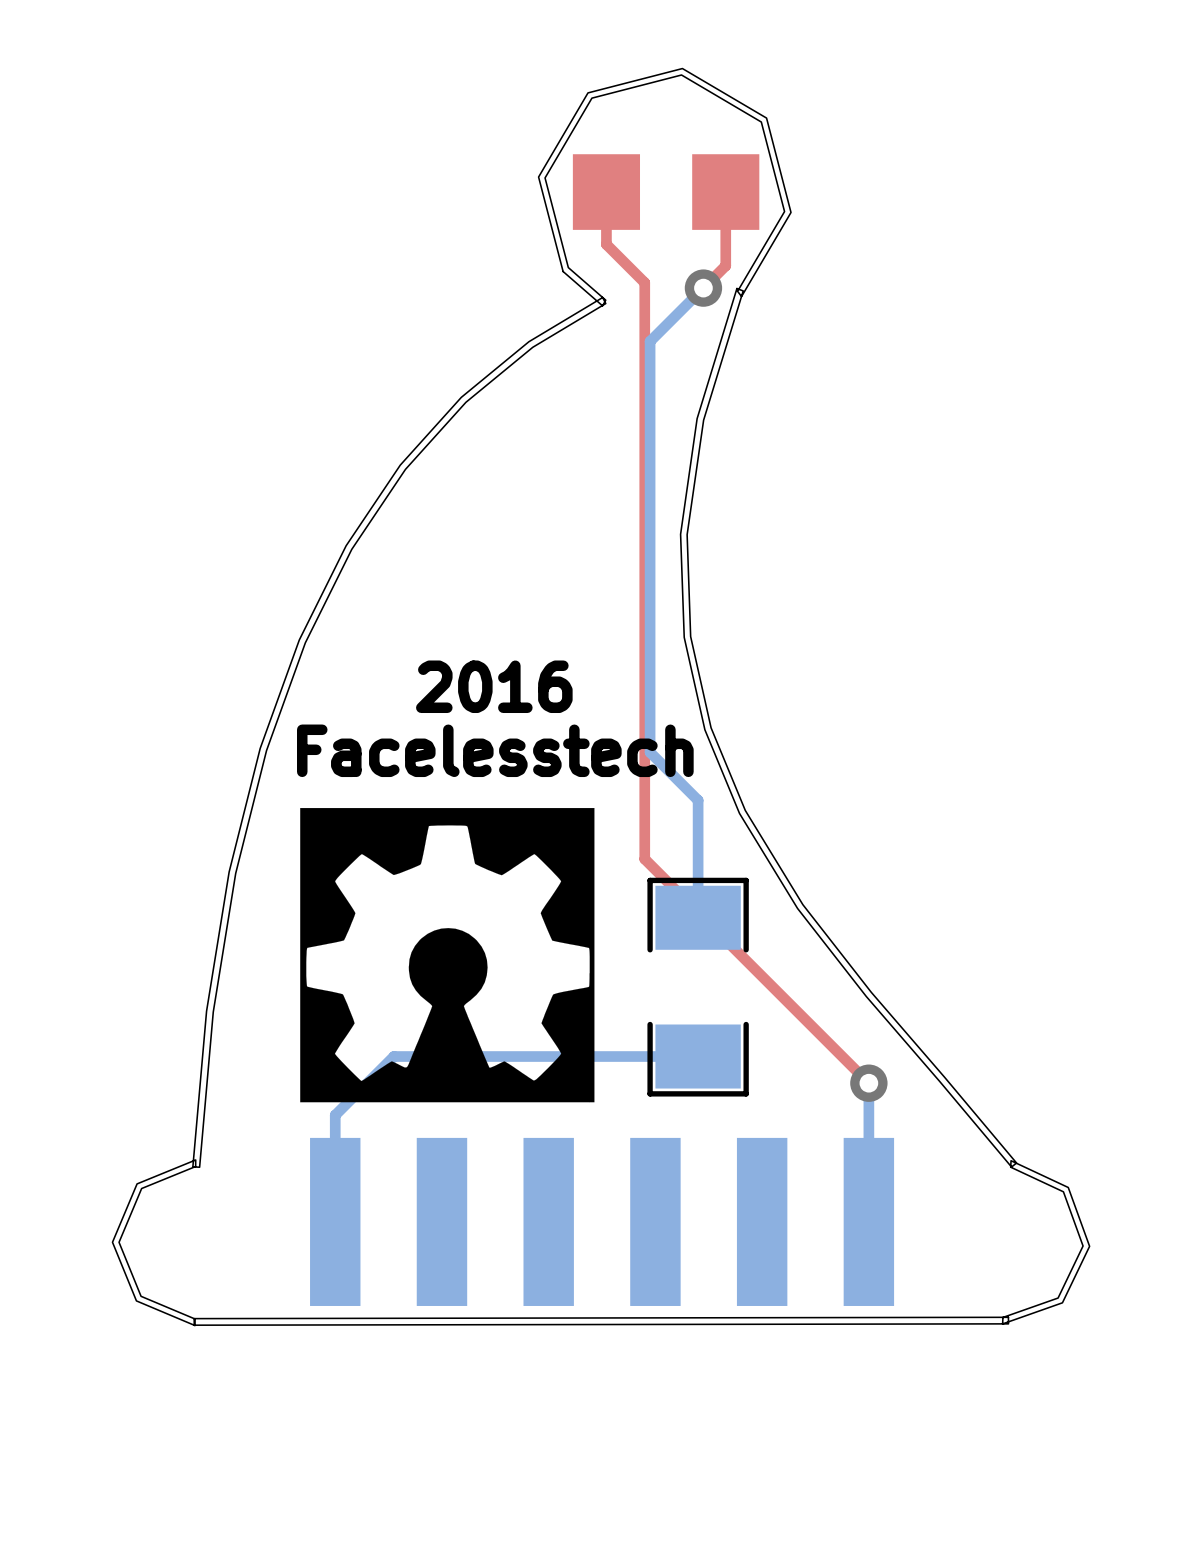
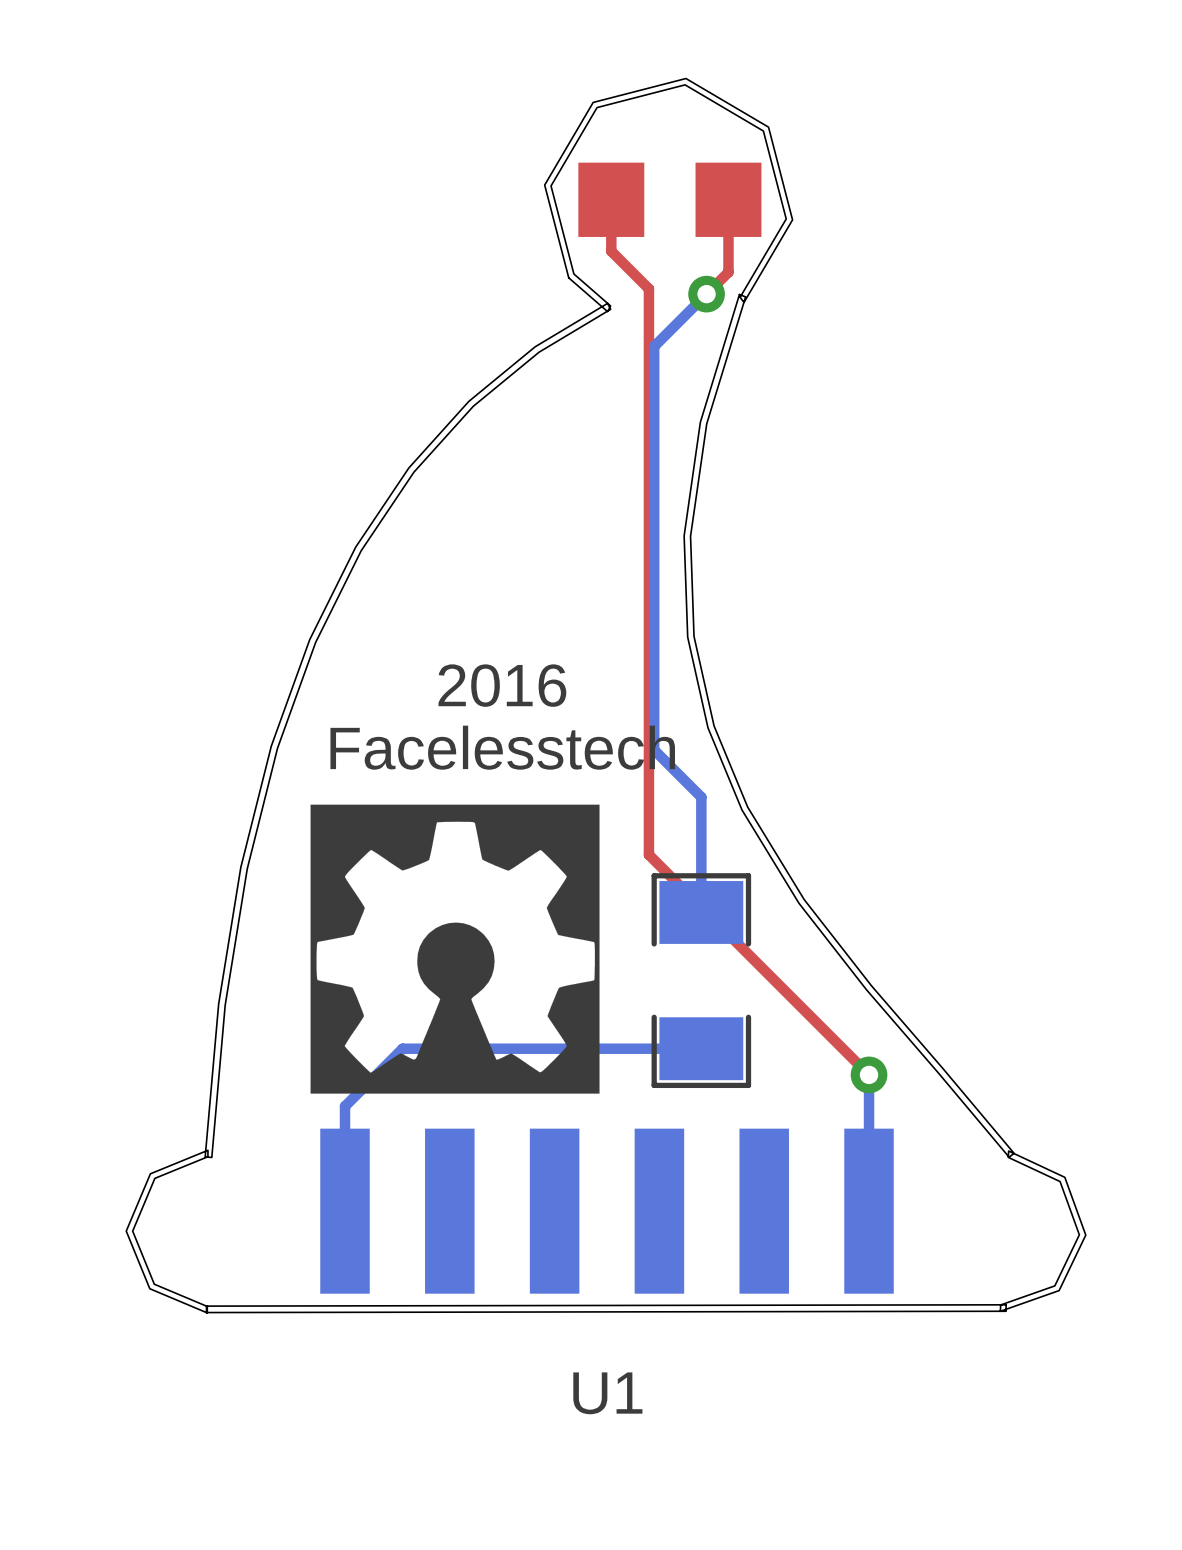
U1 name: none -> U1 (607, 1393)

